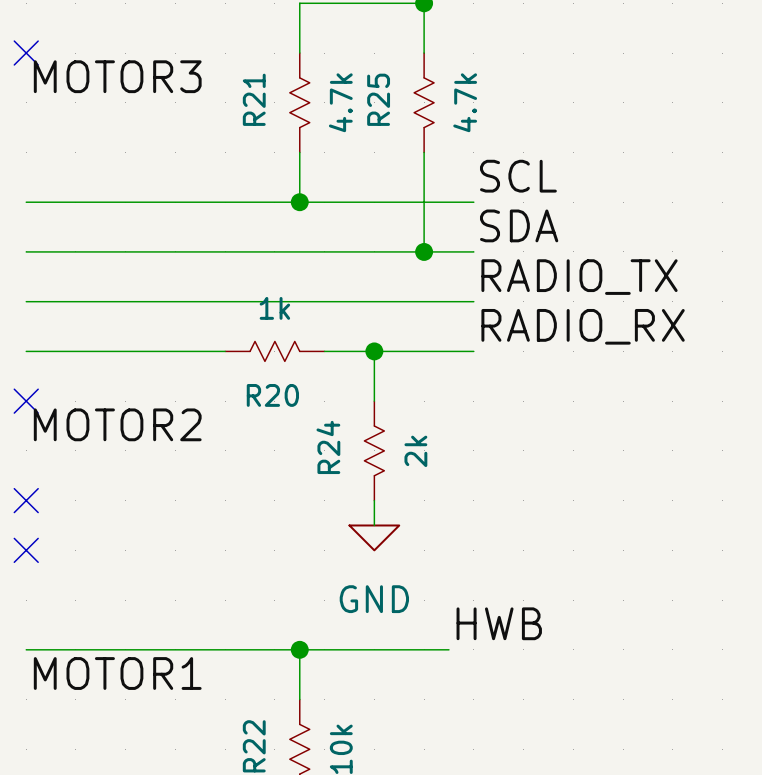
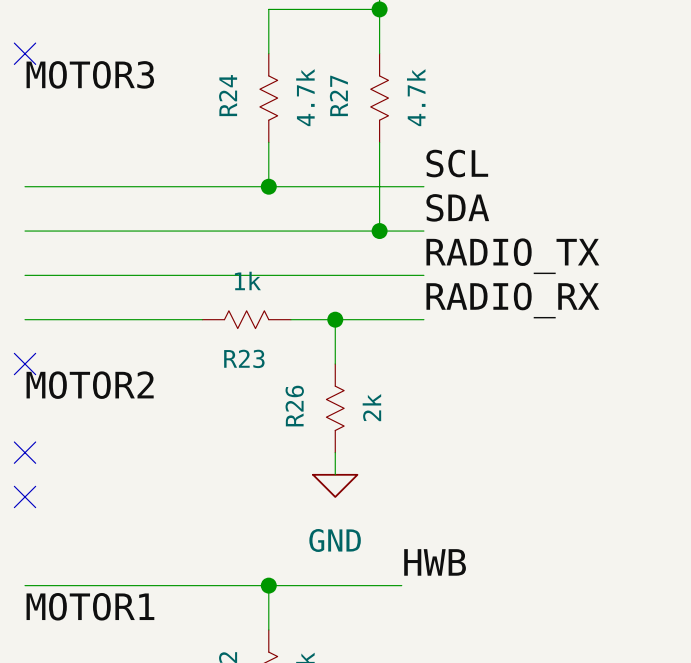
R21 name: R21 (254, 99) -> R24 (228, 95)
R25 name: R25 (378, 99) -> R27 (338, 95)
R20 name: R20 (272, 395) -> R23 (244, 358)
R24 name: R24 (328, 447) -> R26 (294, 406)

